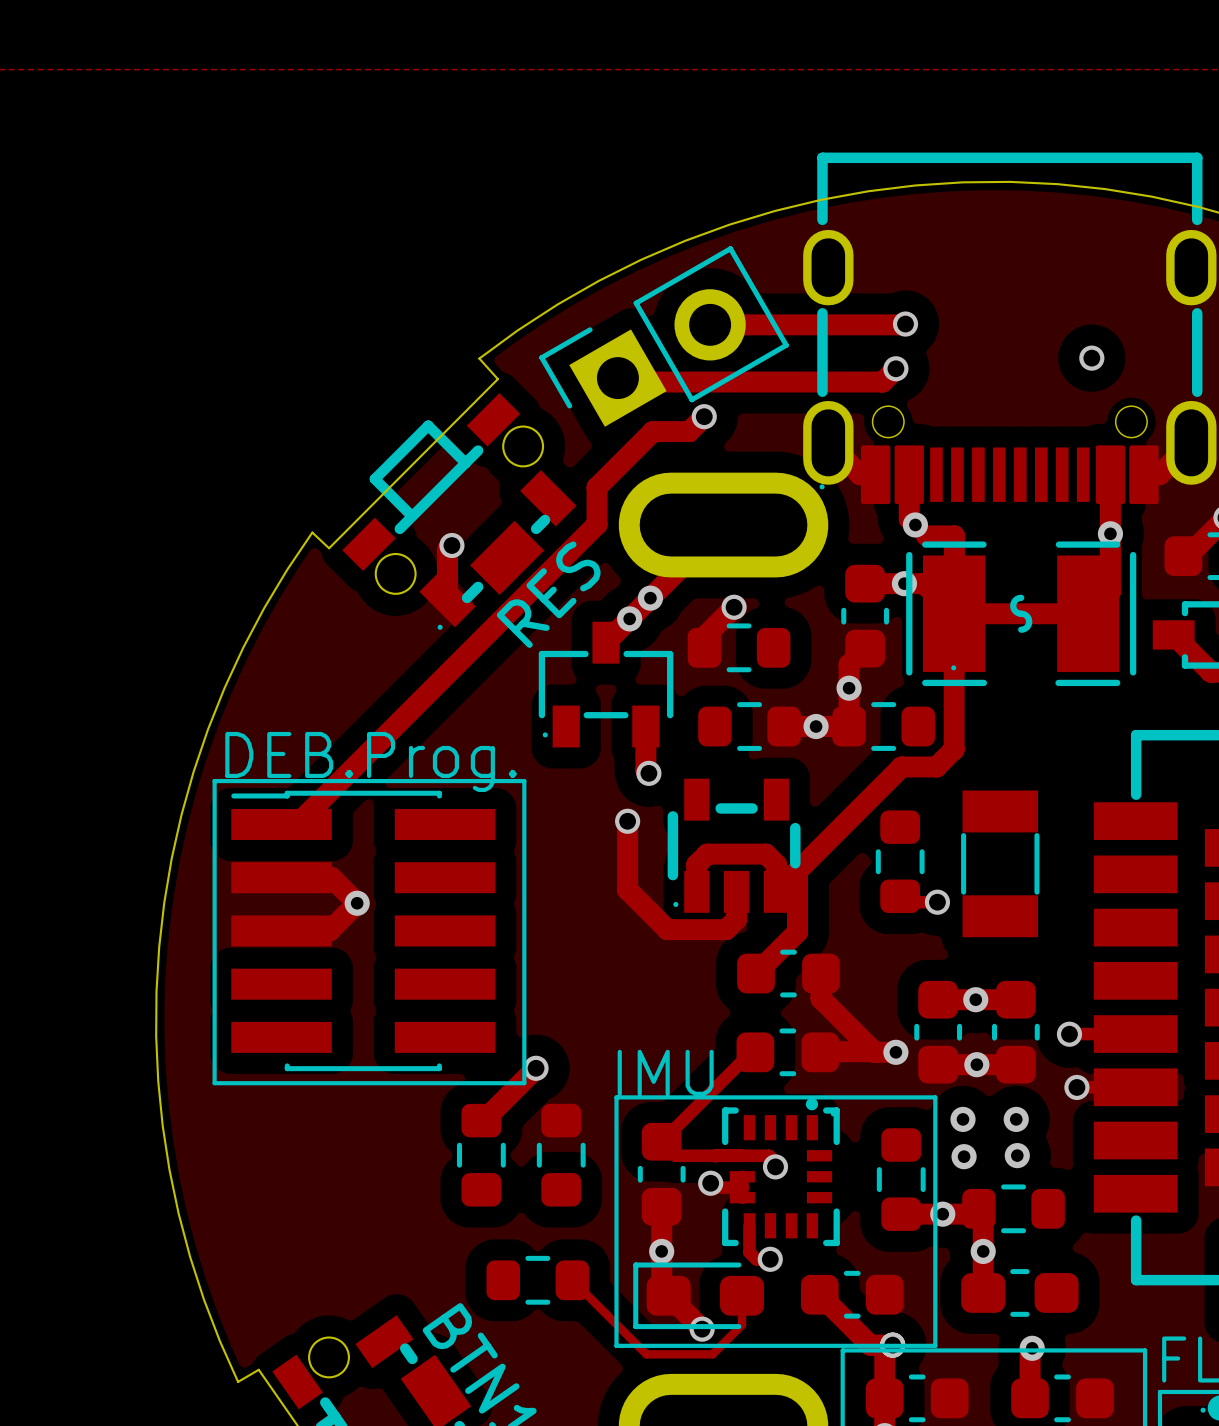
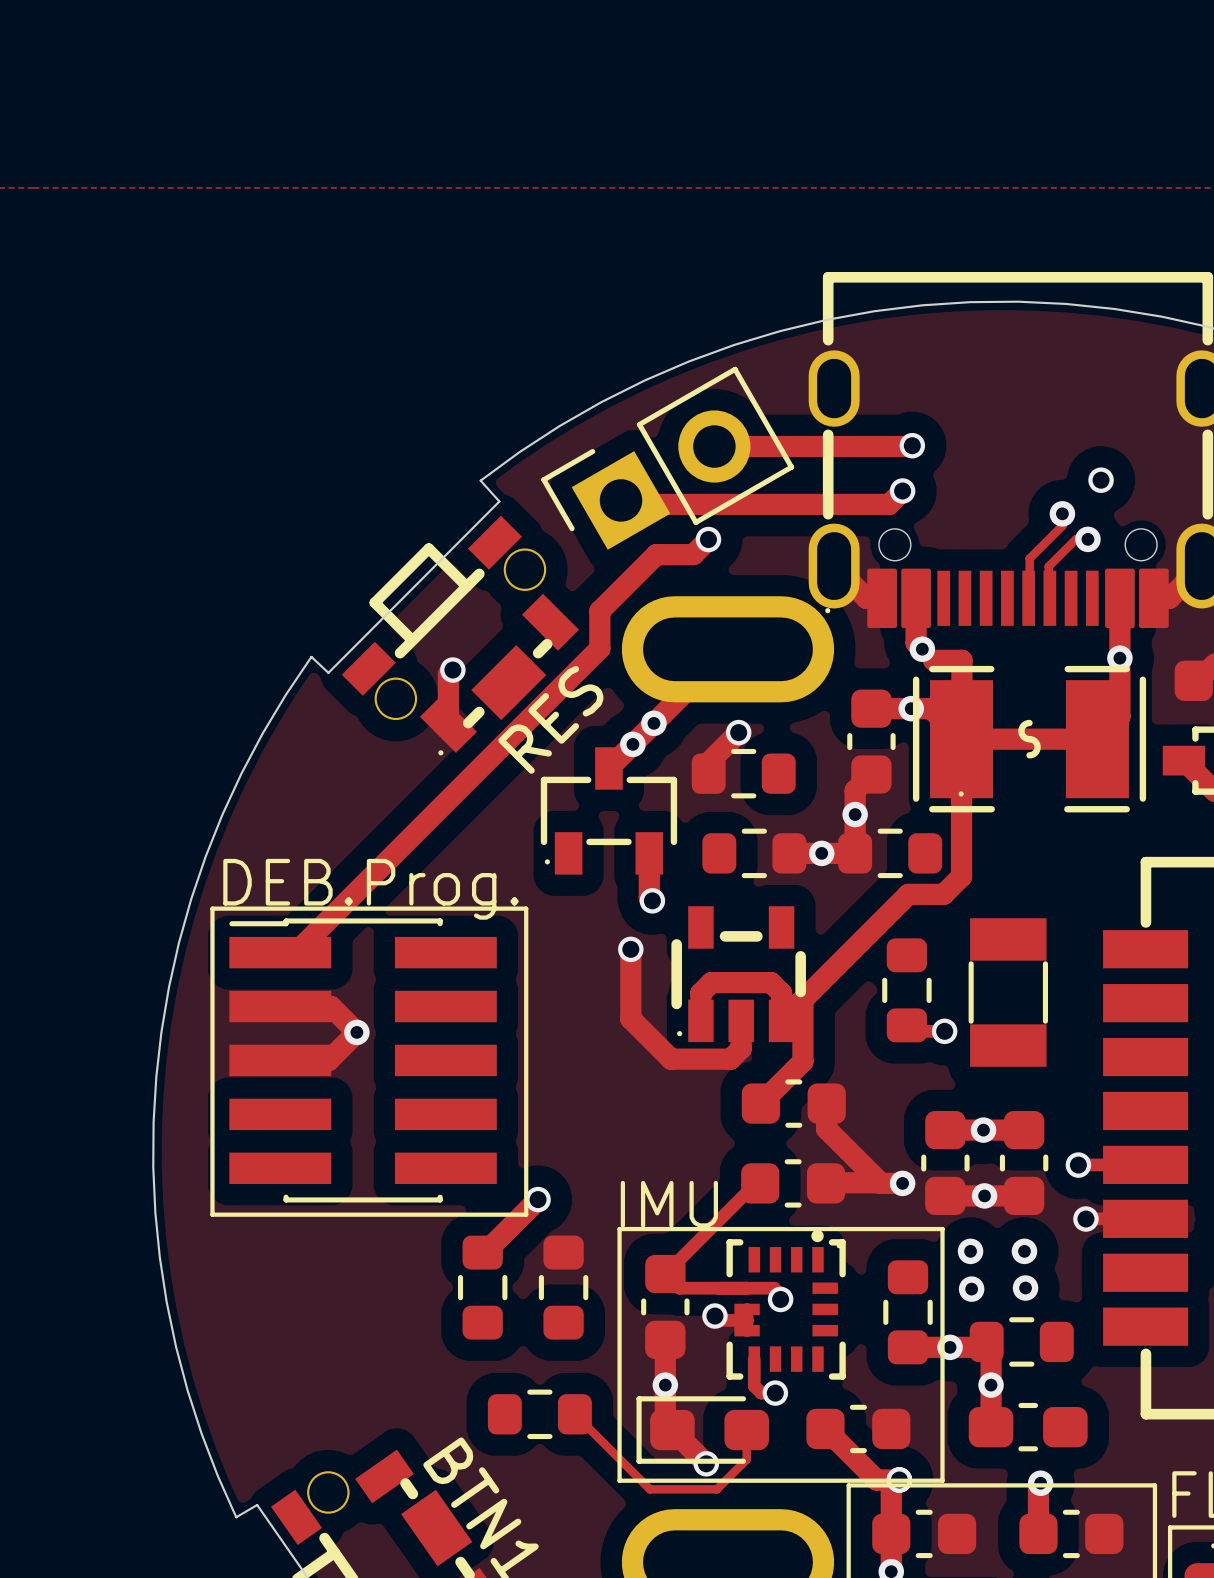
track: none -> (1062, 513) (1062, 525) (1029, 558) (1028, 598)
via: none -> (1062, 513)
track: none -> (1087, 539) (1075, 539) (1048, 566) (1049, 598)
via: none -> (1087, 539)

